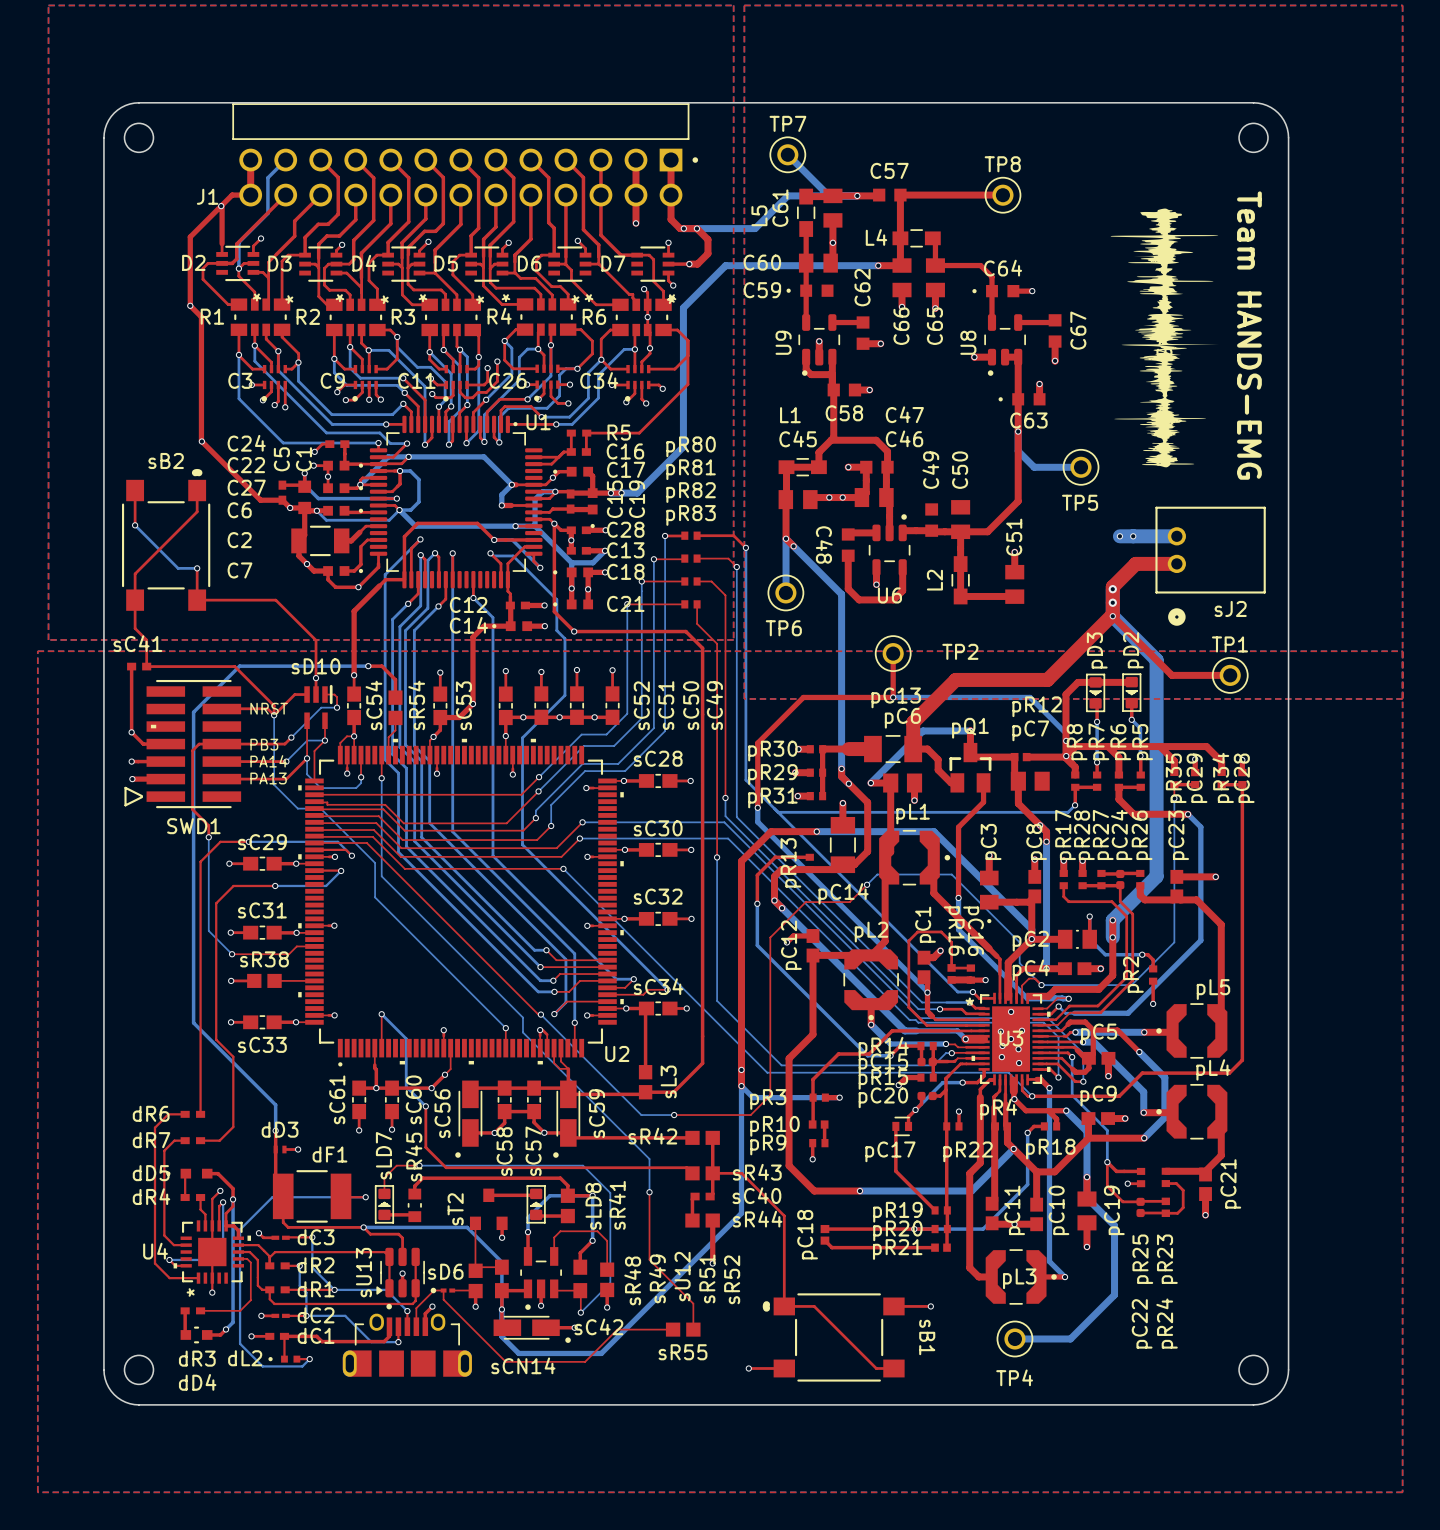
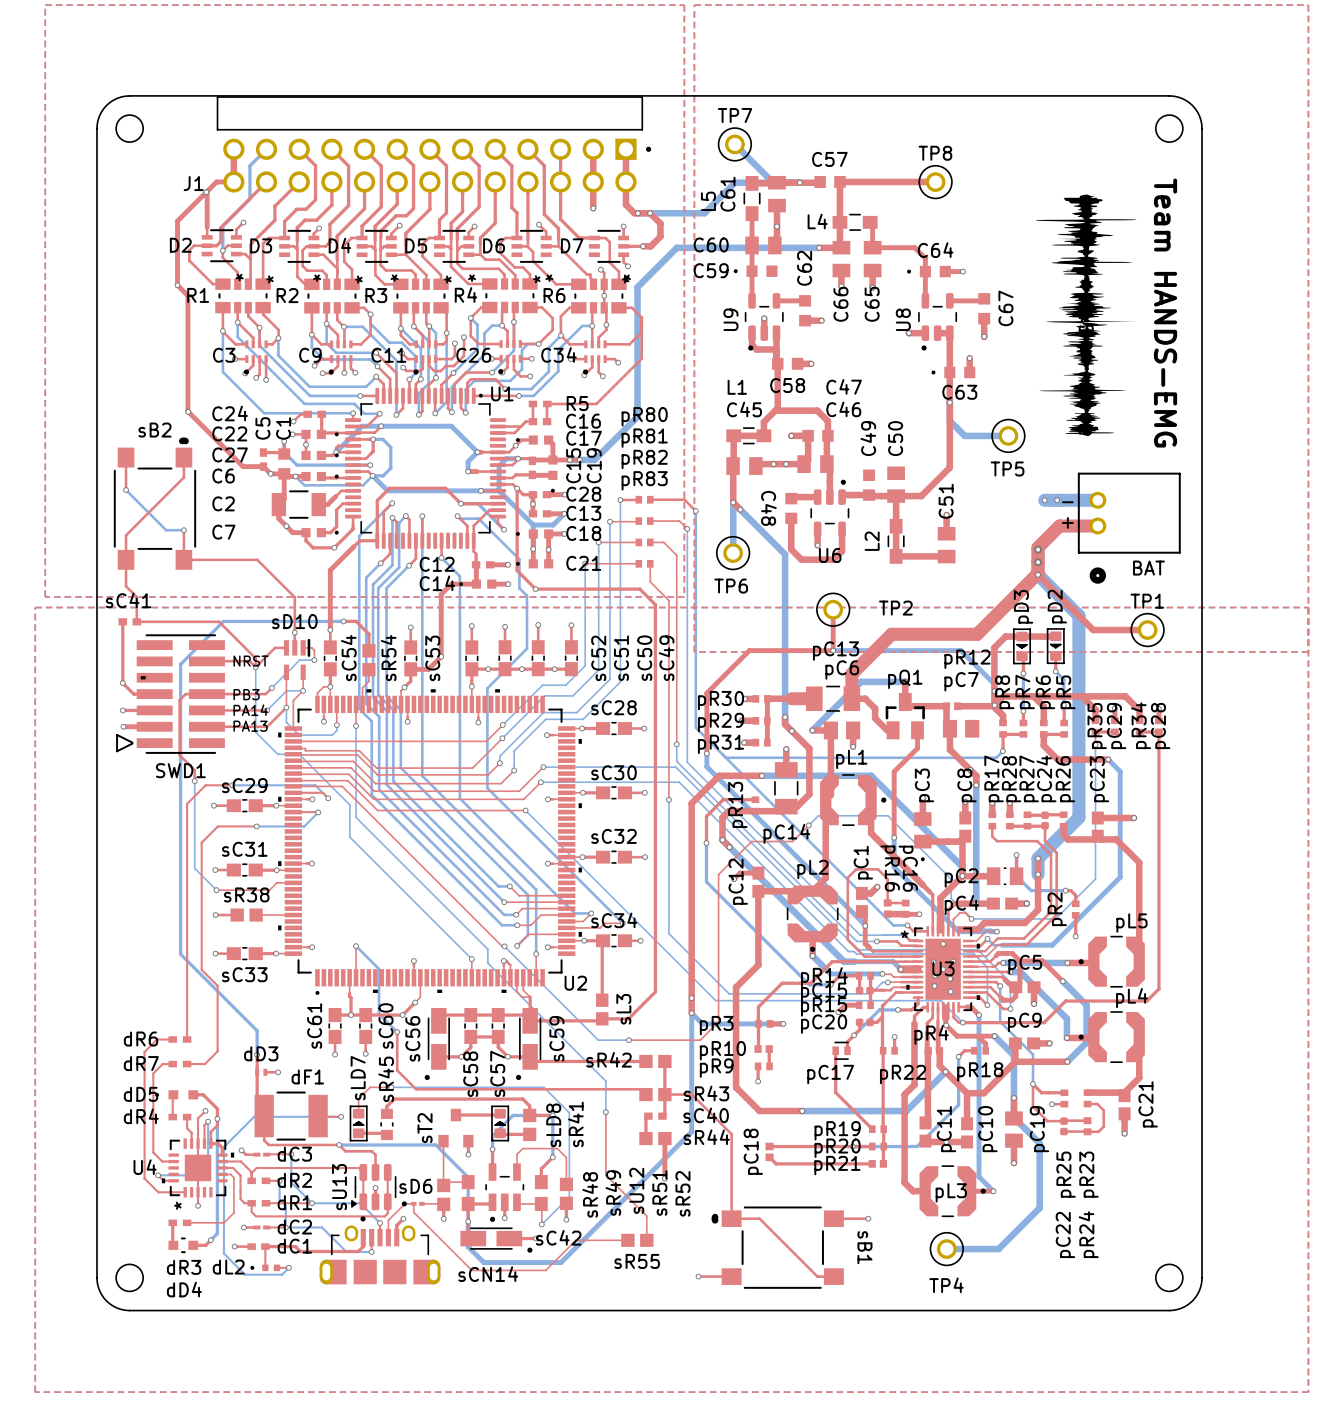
text: none -> - (1067, 502)
text: none -> + (1067, 522)
sJ2 name: sJ2 (1230, 608) -> BAT (1148, 568)

